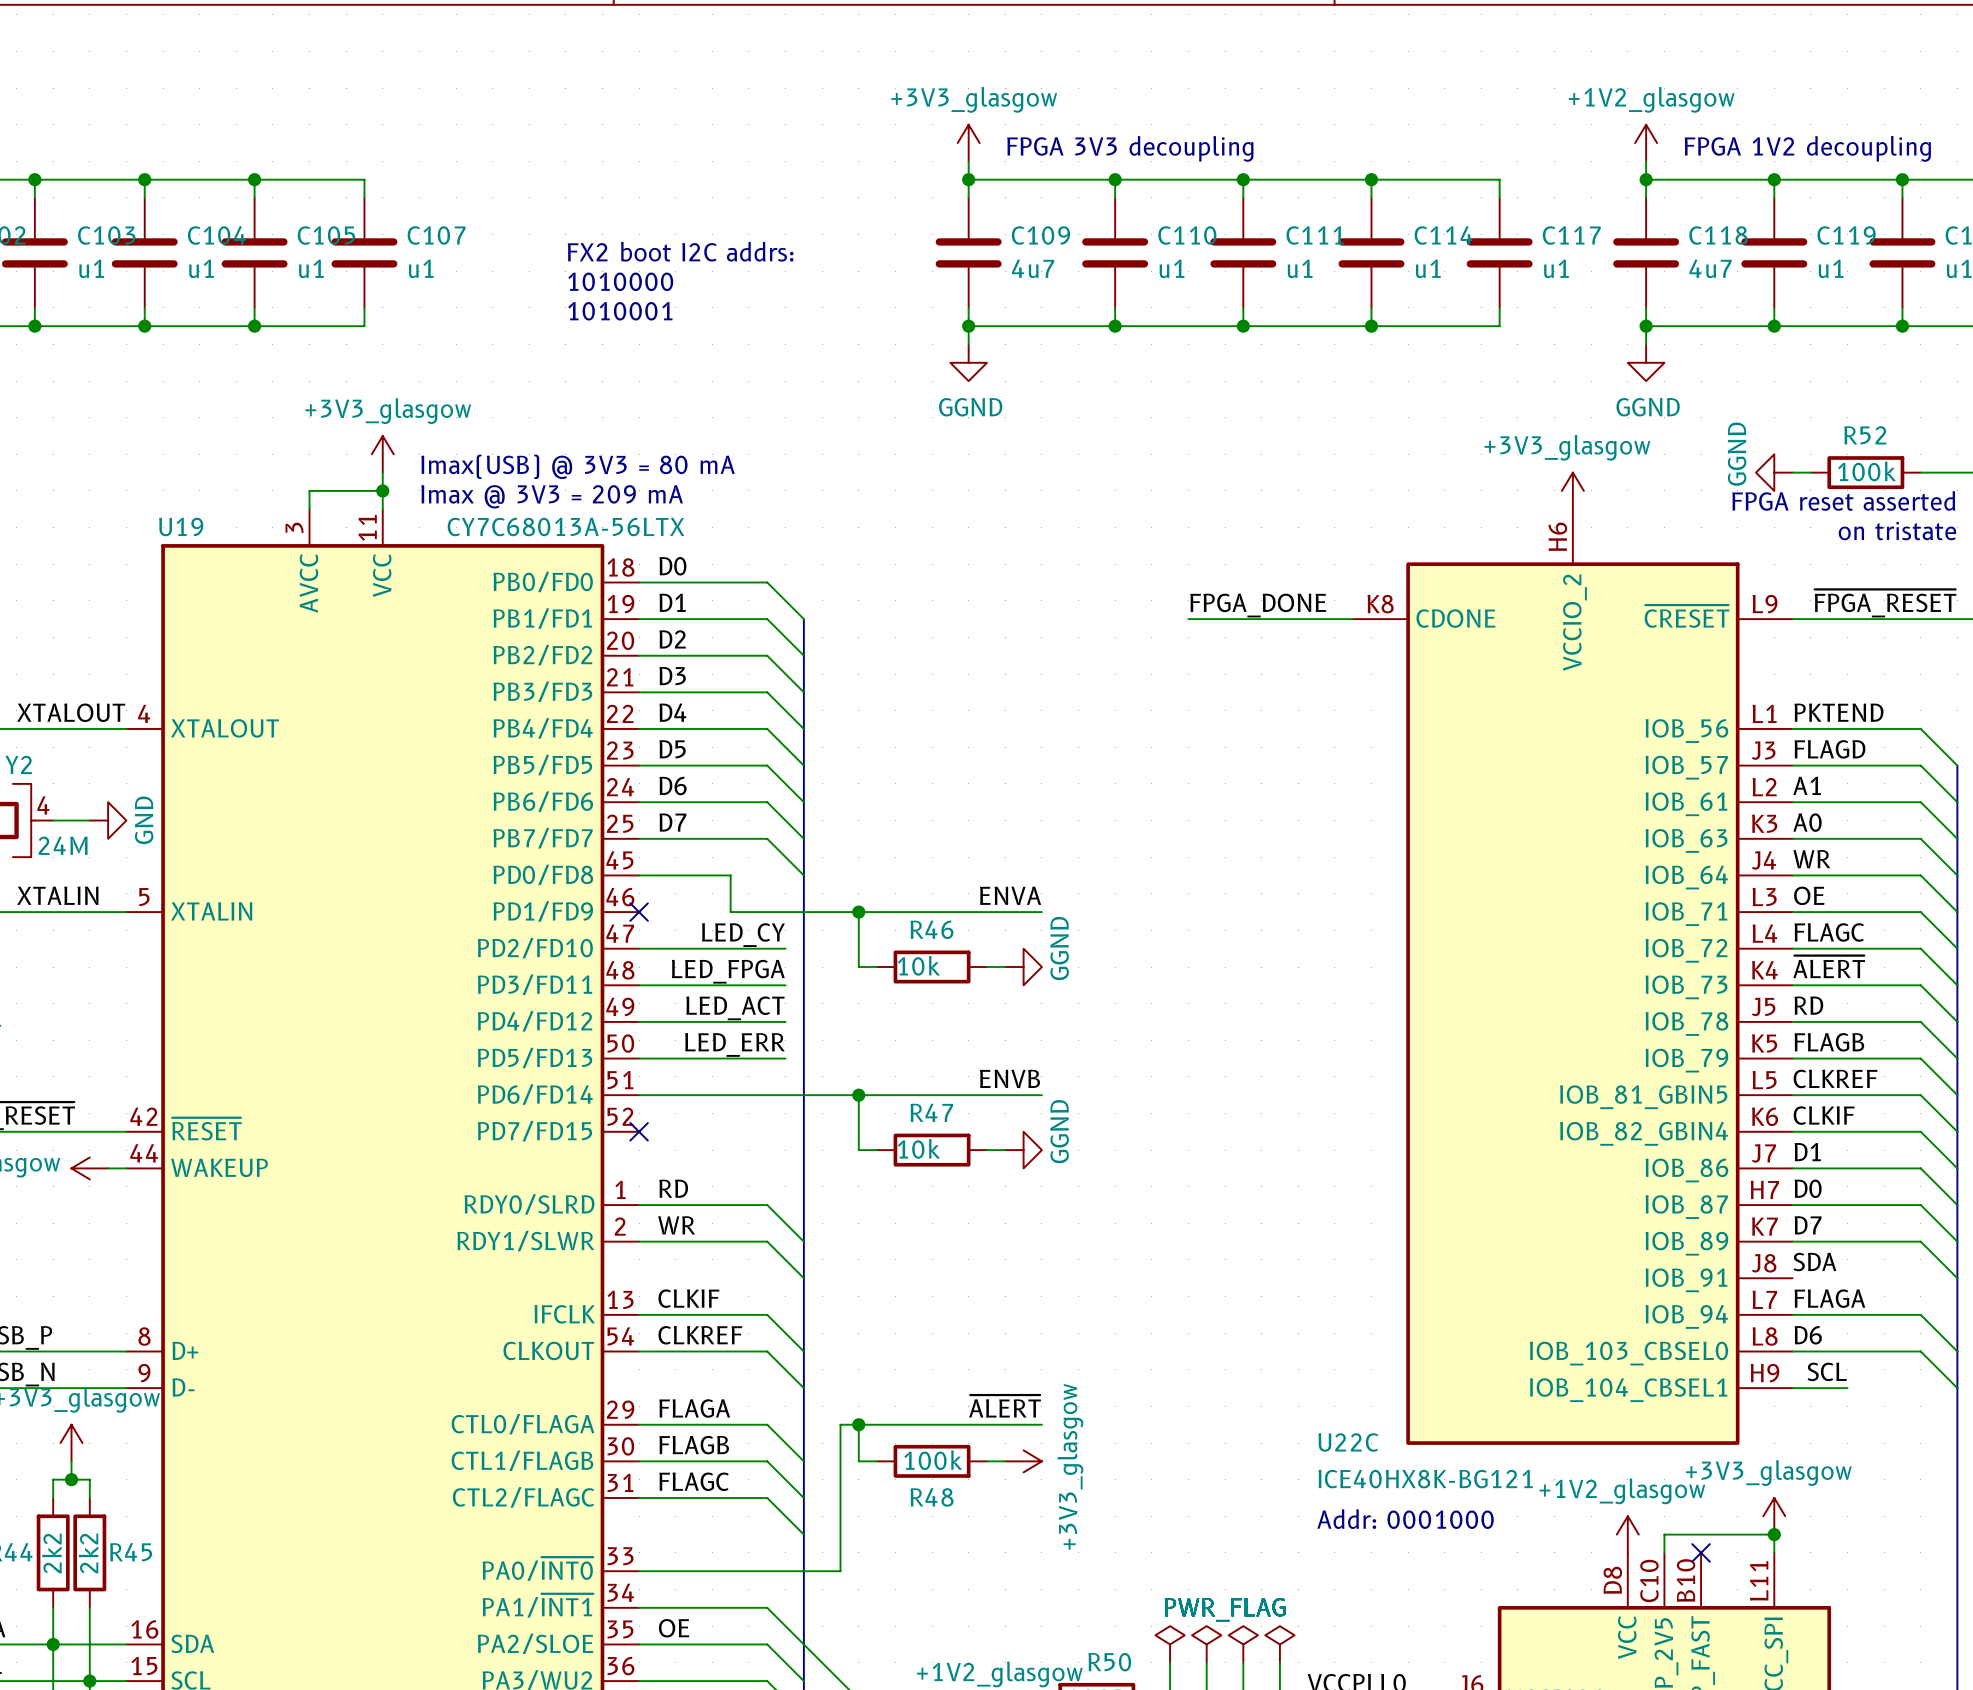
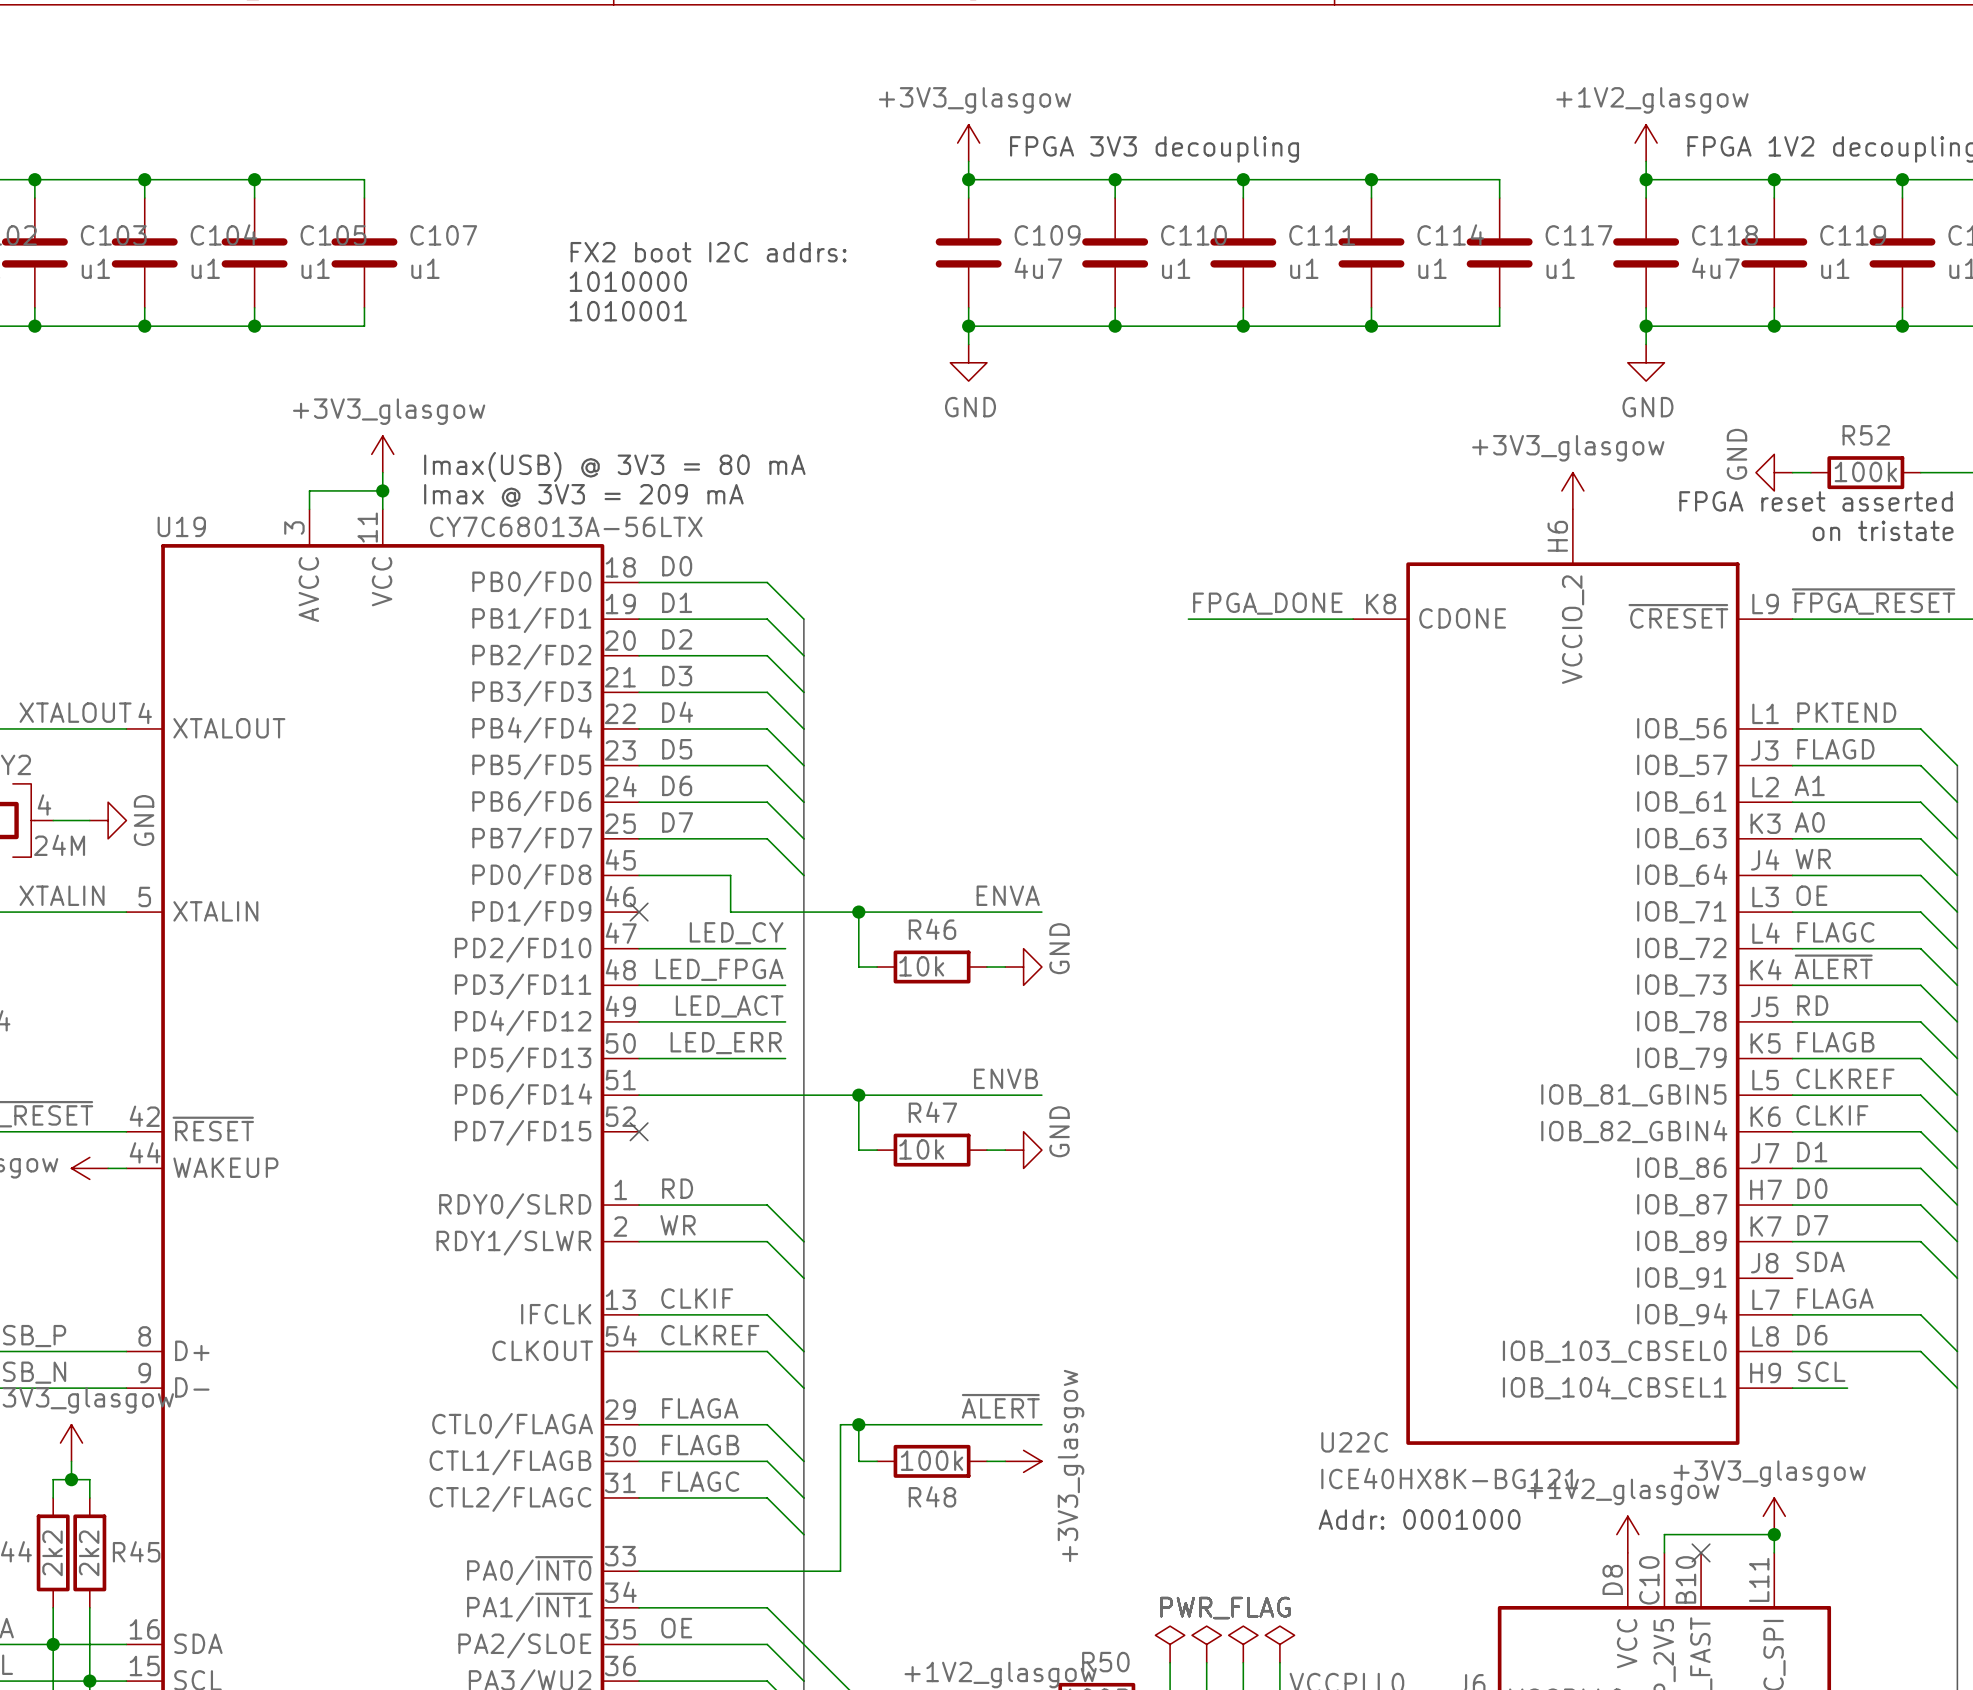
power symbol: GGND (968, 362) -> GND (968, 362)
power symbol: GGND (1646, 362) -> GND (1646, 362)
power symbol: GGND (1774, 472) -> GND (1774, 472)
power symbol: GGND (1023, 967) -> GND (1023, 967)
power symbol: GGND (1023, 1150) -> GND (1023, 1150)

